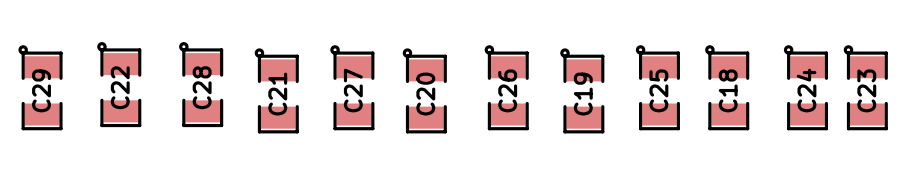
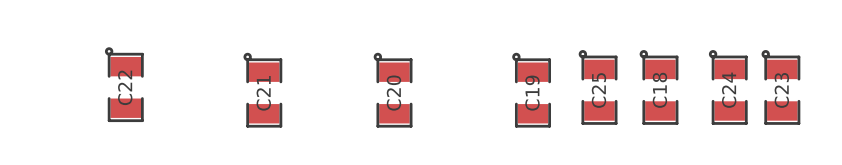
C28: (201, 84) -> none
C29: (40, 87) -> none
C27: (352, 87) -> none
C26: (506, 87) -> none

